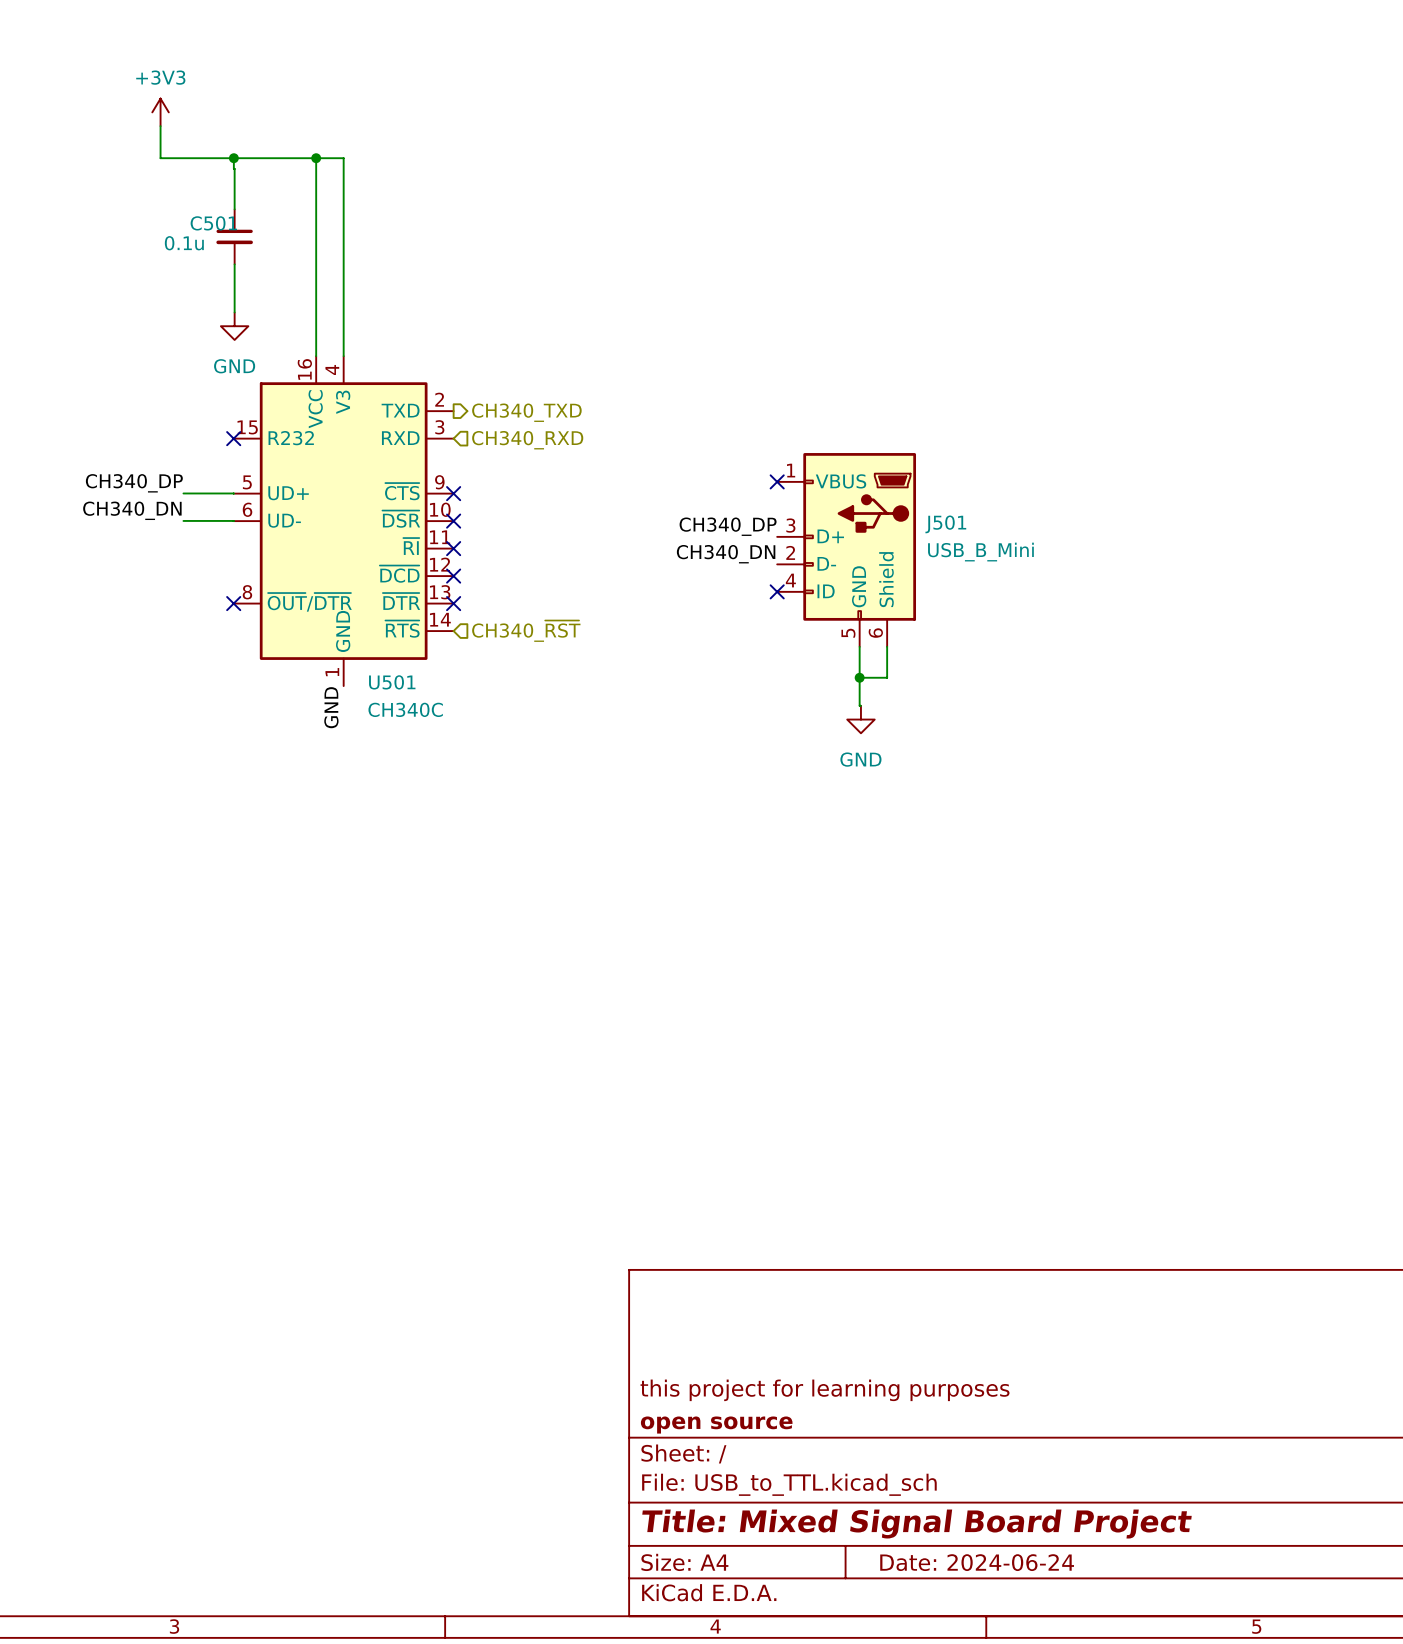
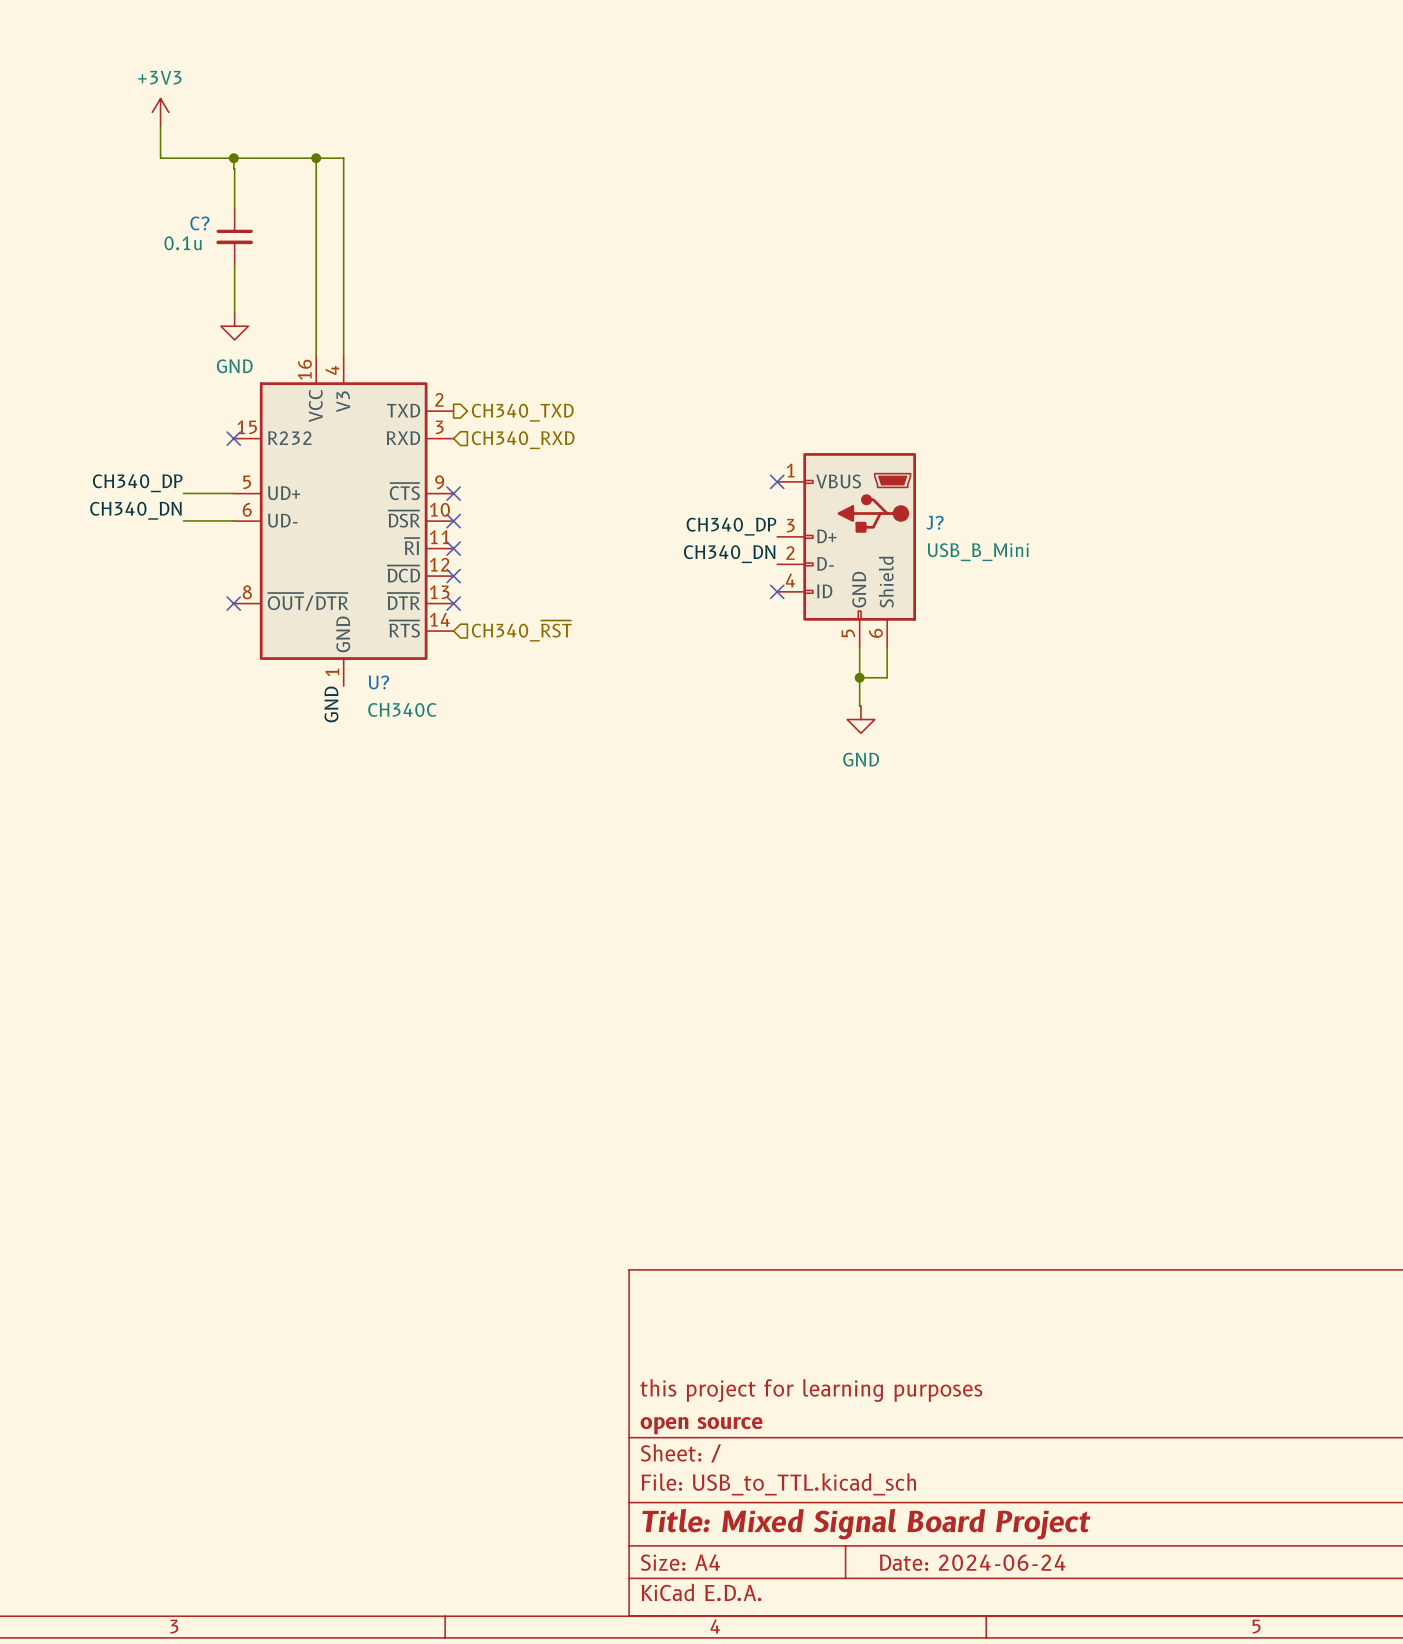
C501 name: C501 (213, 223) -> C? (199, 223)
J501 name: J501 (945, 524) -> J? (935, 522)
U501 name: U501 (392, 682) -> U? (378, 682)

